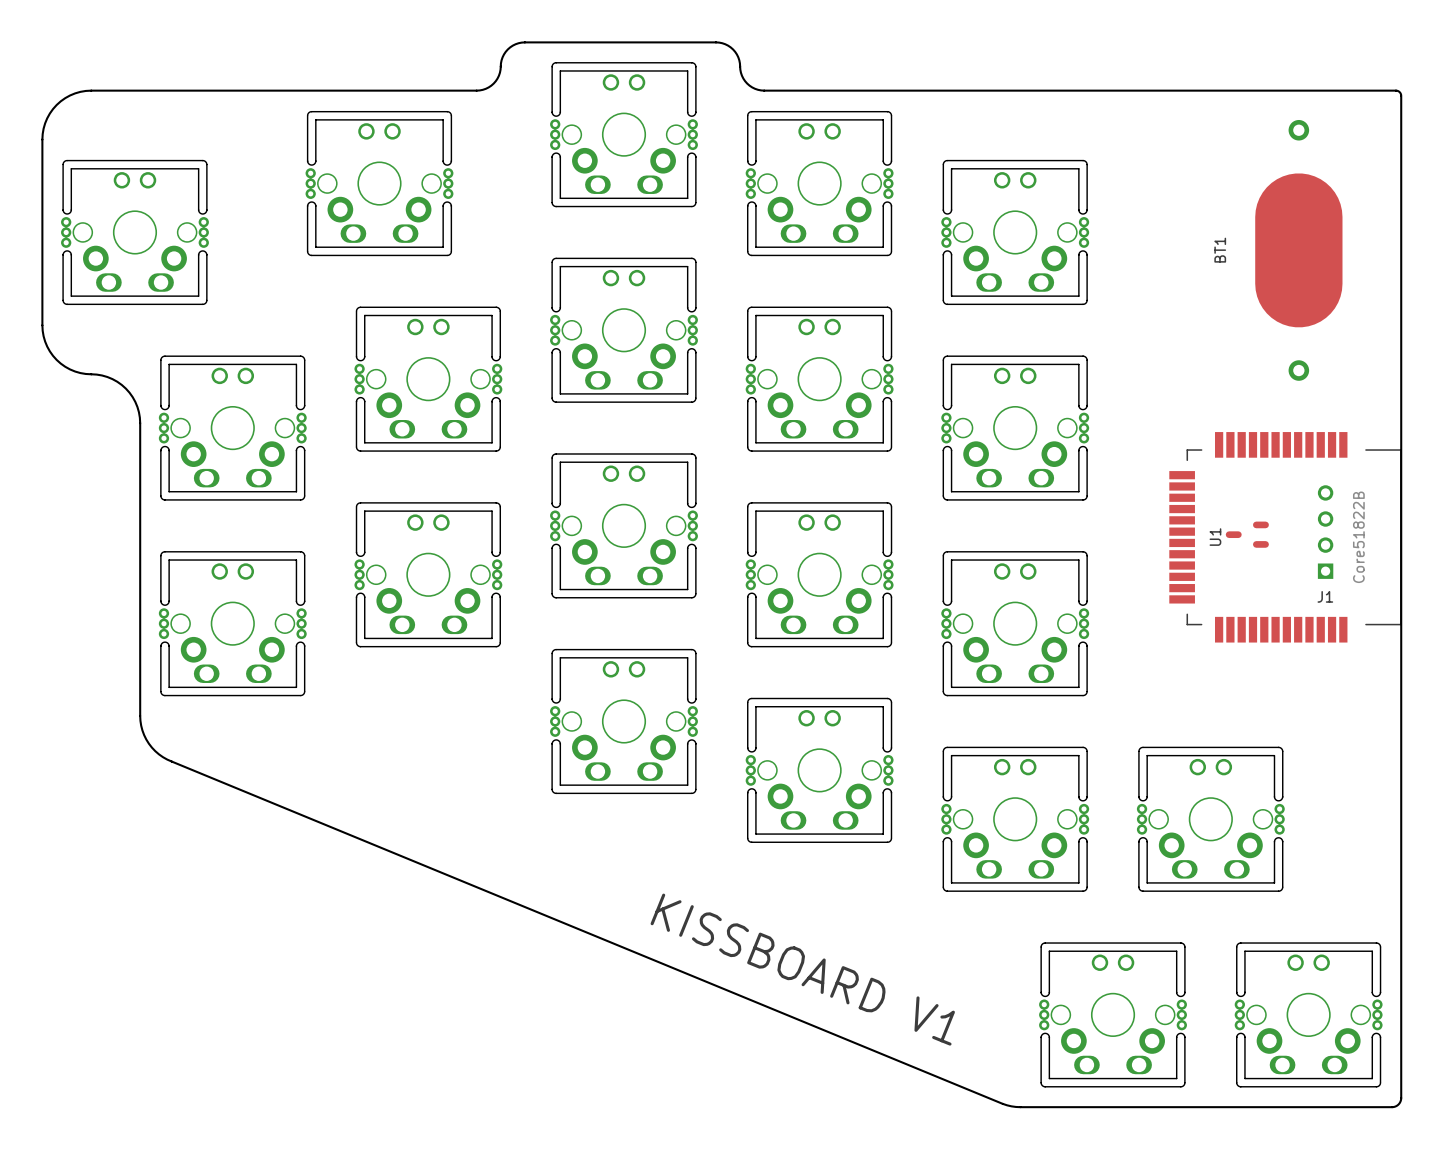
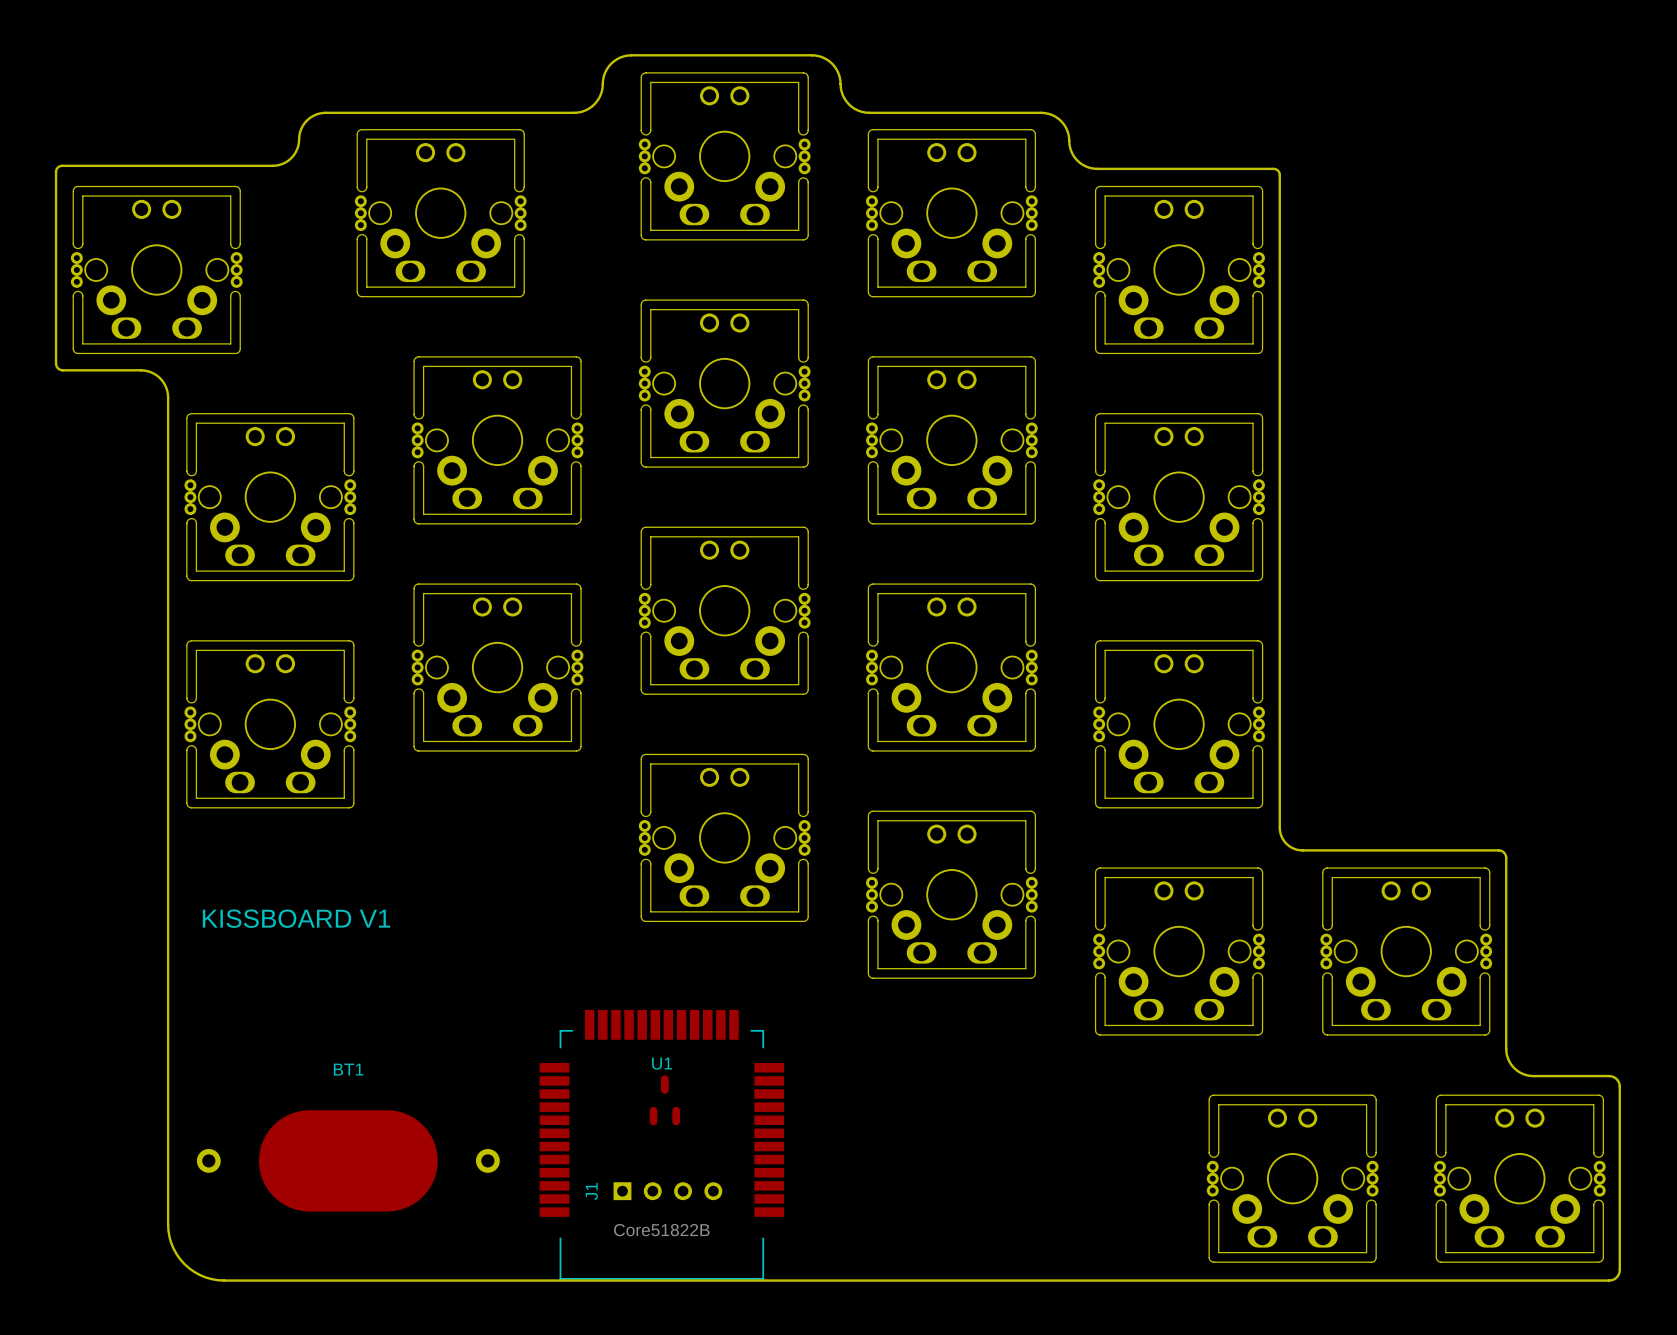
board edge: (715, 42) (518, 43) (510, 47) (503, 54) (499, 72) (495, 81) (488, 87) (479, 90) (91, 90) (80, 91) (65, 98) (49, 113) (42, 134) (43, 336) (49, 351) (65, 366) (80, 373) (107, 377) (125, 388) (137, 407) (140, 423) -> none
board edge: (716, 42) (725, 44) (733, 49) (738, 57) (740, 72) (745, 81) (755, 88) (764, 90) -> none
board edge: (764, 90) (1396, 90) (1399, 92) (1401, 95) -> none
board edge: (1401, 96) (1401, 1098) (1399, 1103) (1394, 1106) (1020, 1107) (1007, 1105) (167, 759) (148, 743) (140, 720) (140, 423) -> none
board edge: none -> (1041, 112) (861, 111) (851, 106) (844, 98) (839, 76) (834, 66) (826, 59) (815, 55) (631, 55) (620, 57) (611, 63) (604, 73) (601, 91) (596, 101) (588, 108) (577, 112) (322, 113) (312, 116) (304, 123) (300, 132) (295, 152) (288, 160) (279, 164) (62, 165) (57, 168) (56, 366) (62, 370) (147, 371) (162, 380) (167, 394) (168, 1224)
board edge: none -> (1041, 112) (1051, 114) (1061, 121) (1067, 130) (1073, 154) (1080, 163) (1090, 167) (1273, 168) (1278, 171) (1280, 833) (1288, 845) (1299, 850) (1498, 850) (1504, 853) (1506, 857) (1506, 1048) (1509, 1062) (1519, 1072) (1529, 1075) (1610, 1076) (1615, 1078) (1619, 1083) (1619, 1269) (1617, 1276) (1609, 1280) (224, 1280) (205, 1277) (184, 1264) (173, 1248) (168, 1224)
BT1 rotation: 0° (1298, 250) -> 90° clockwise (348, 1160)
BT1 position: (1298, 250) -> (348, 1160)
J1 rotation: 0° (1325, 532) -> 90° clockwise (667, 1191)
J1 position: (1325, 532) -> (667, 1191)
part: (1247, 534) -> none
U1 rotation: 0° (1285, 537) -> 90° clockwise (661, 1144)
U1 position: (1285, 537) -> (661, 1144)
text: none -> KISSBOARD V1 (296, 918)
part: none -> (664, 1100)
text: KISSBOARD V1 (802, 969) -> none

